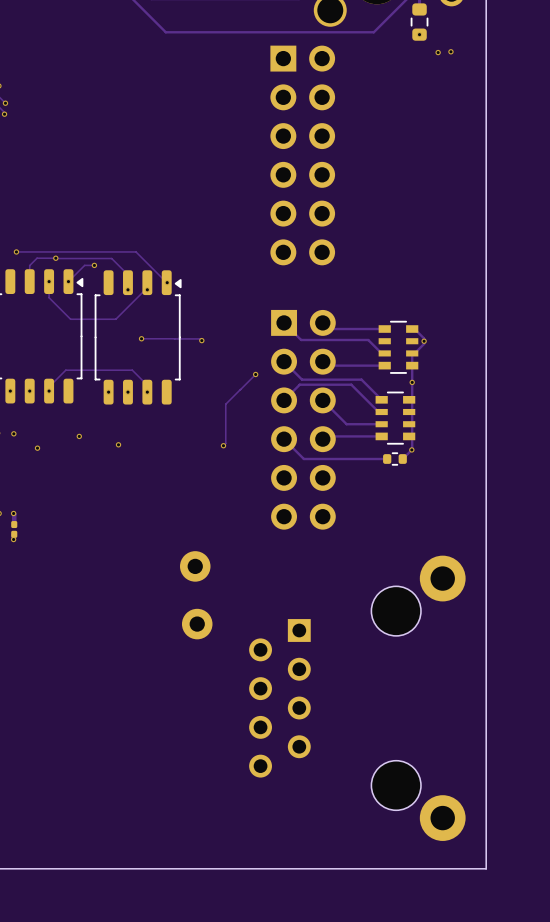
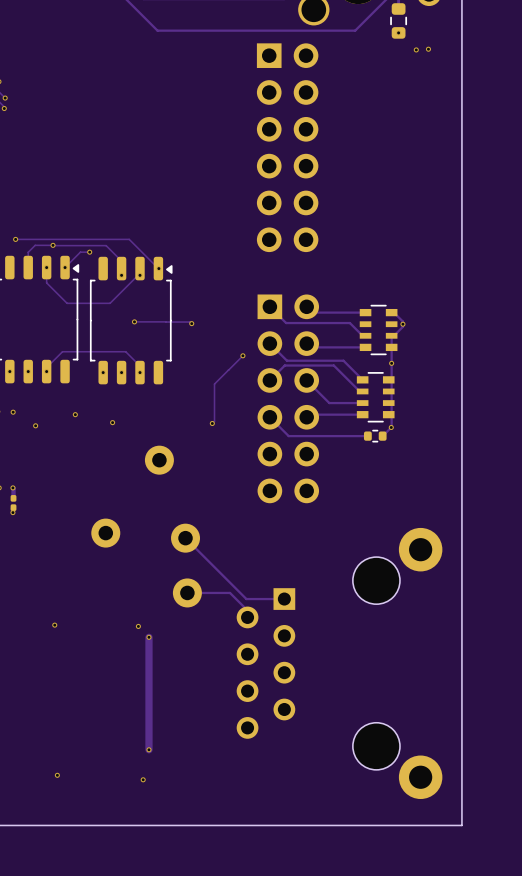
part: none -> (159, 460)
part: none -> (105, 533)
track: none -> (185, 538) (246, 599) (284, 599)
track: none -> (187, 592) (230, 592) (247, 610) (247, 617)
via: none -> (54, 625)
via: none -> (138, 626)
track: none -> (148, 637) (148, 749)
via: none -> (148, 637)
via: none -> (148, 749)
via: none -> (57, 775)
via: none -> (143, 779)

